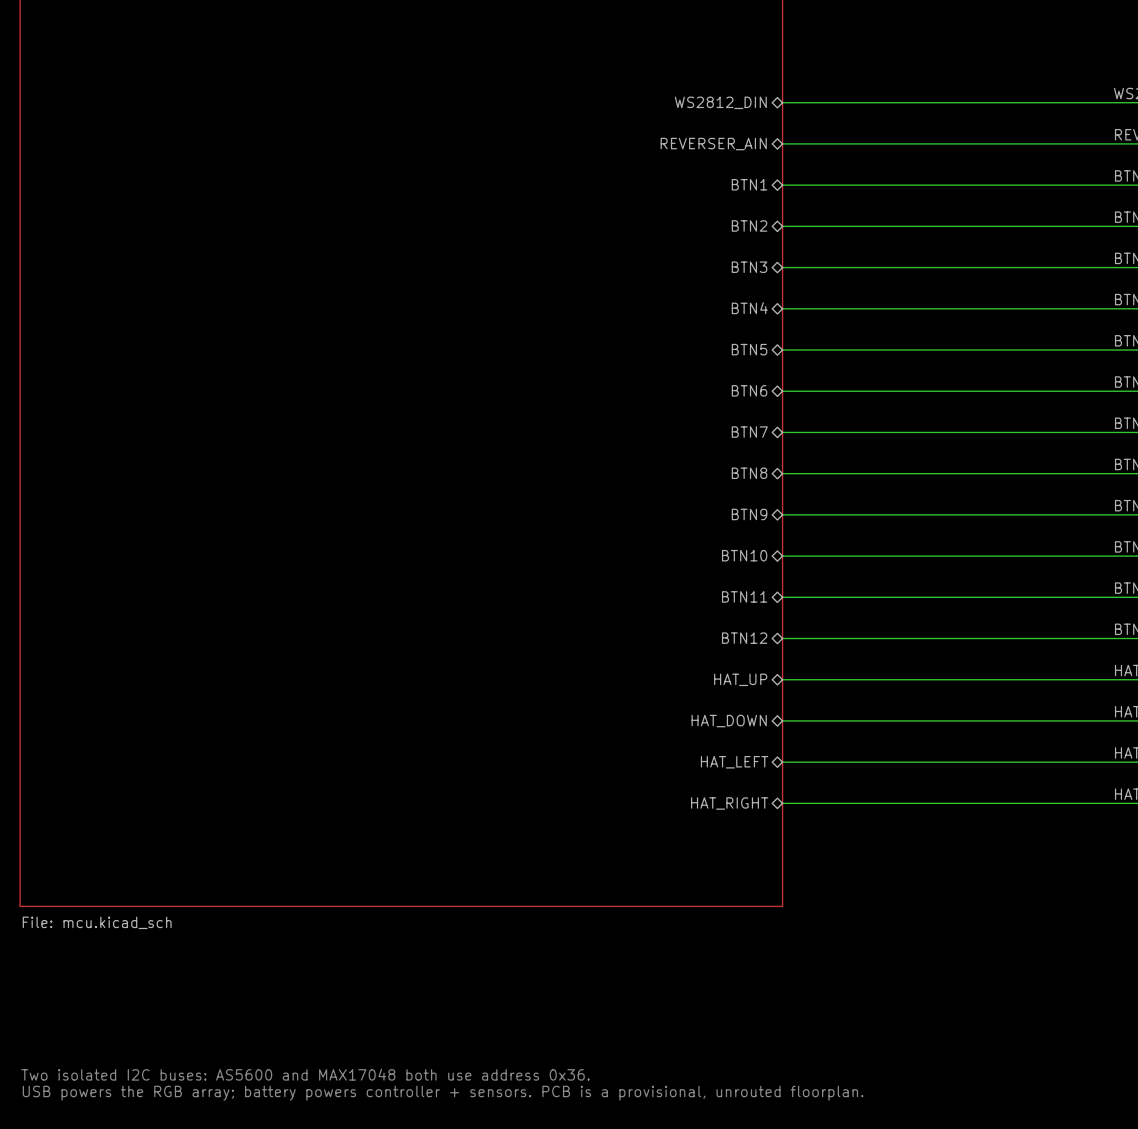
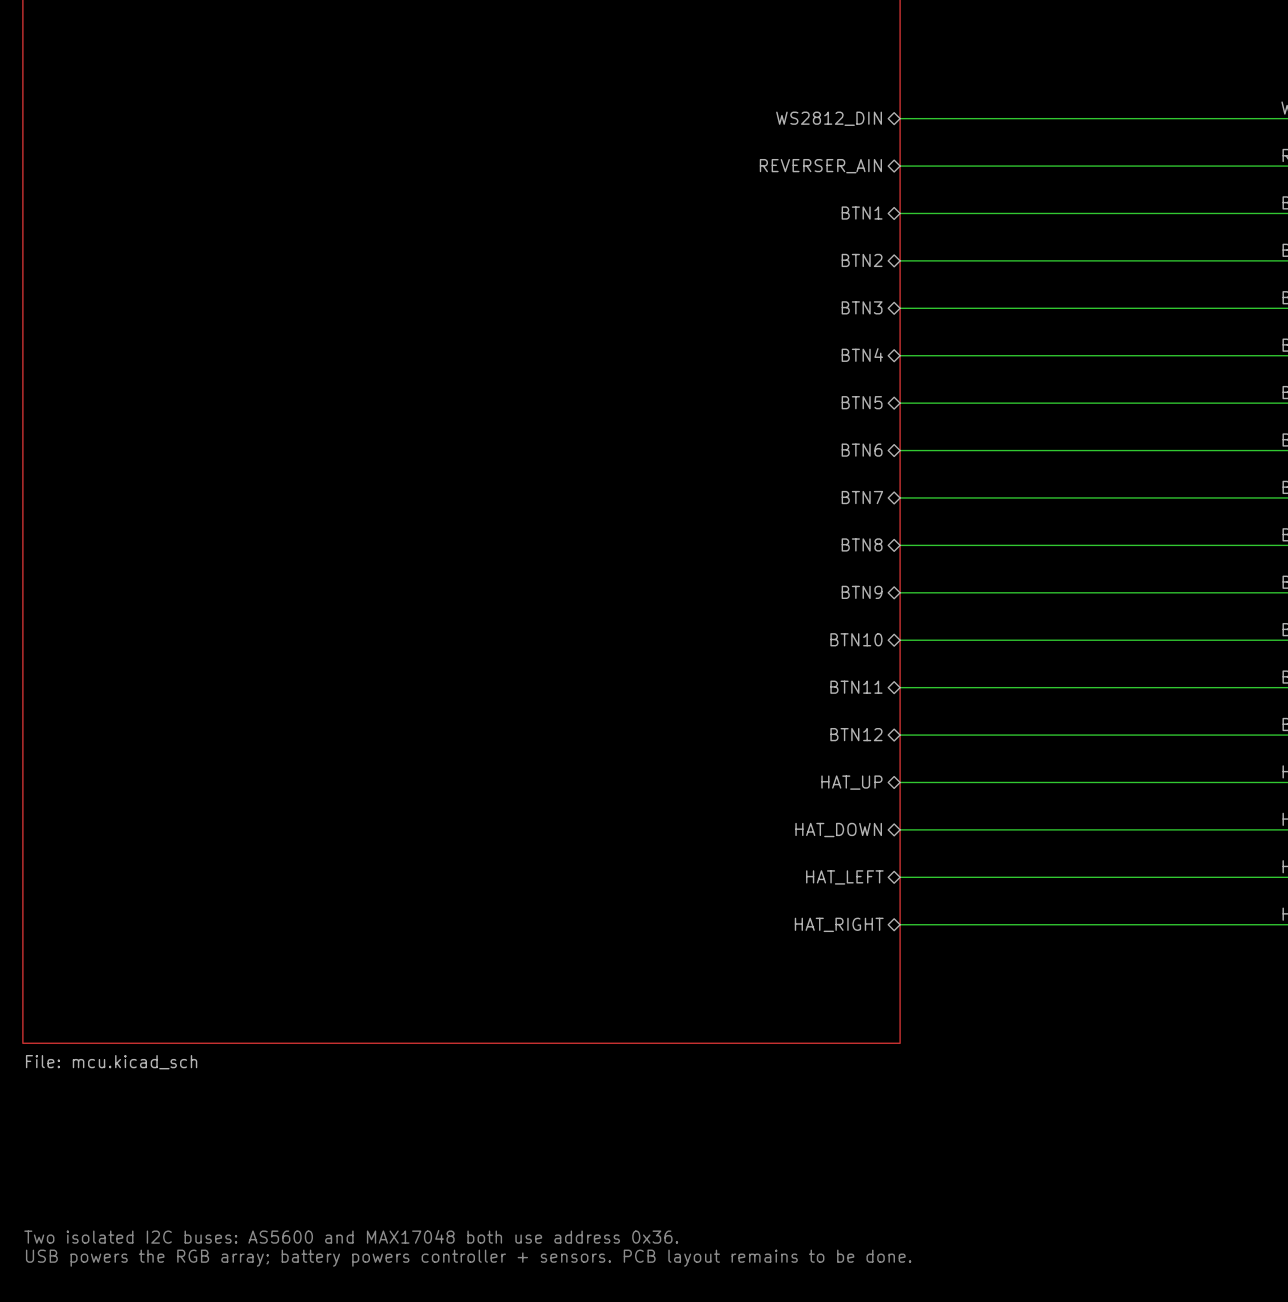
text: USB powers the RGB array; battery powers controller + sensors. PCB is a provisional, unrouted floorplan. (443, 1093) -> USB powers the RGB array; battery powers controller + sensors. PCB layout remains to be done. (468, 1258)

